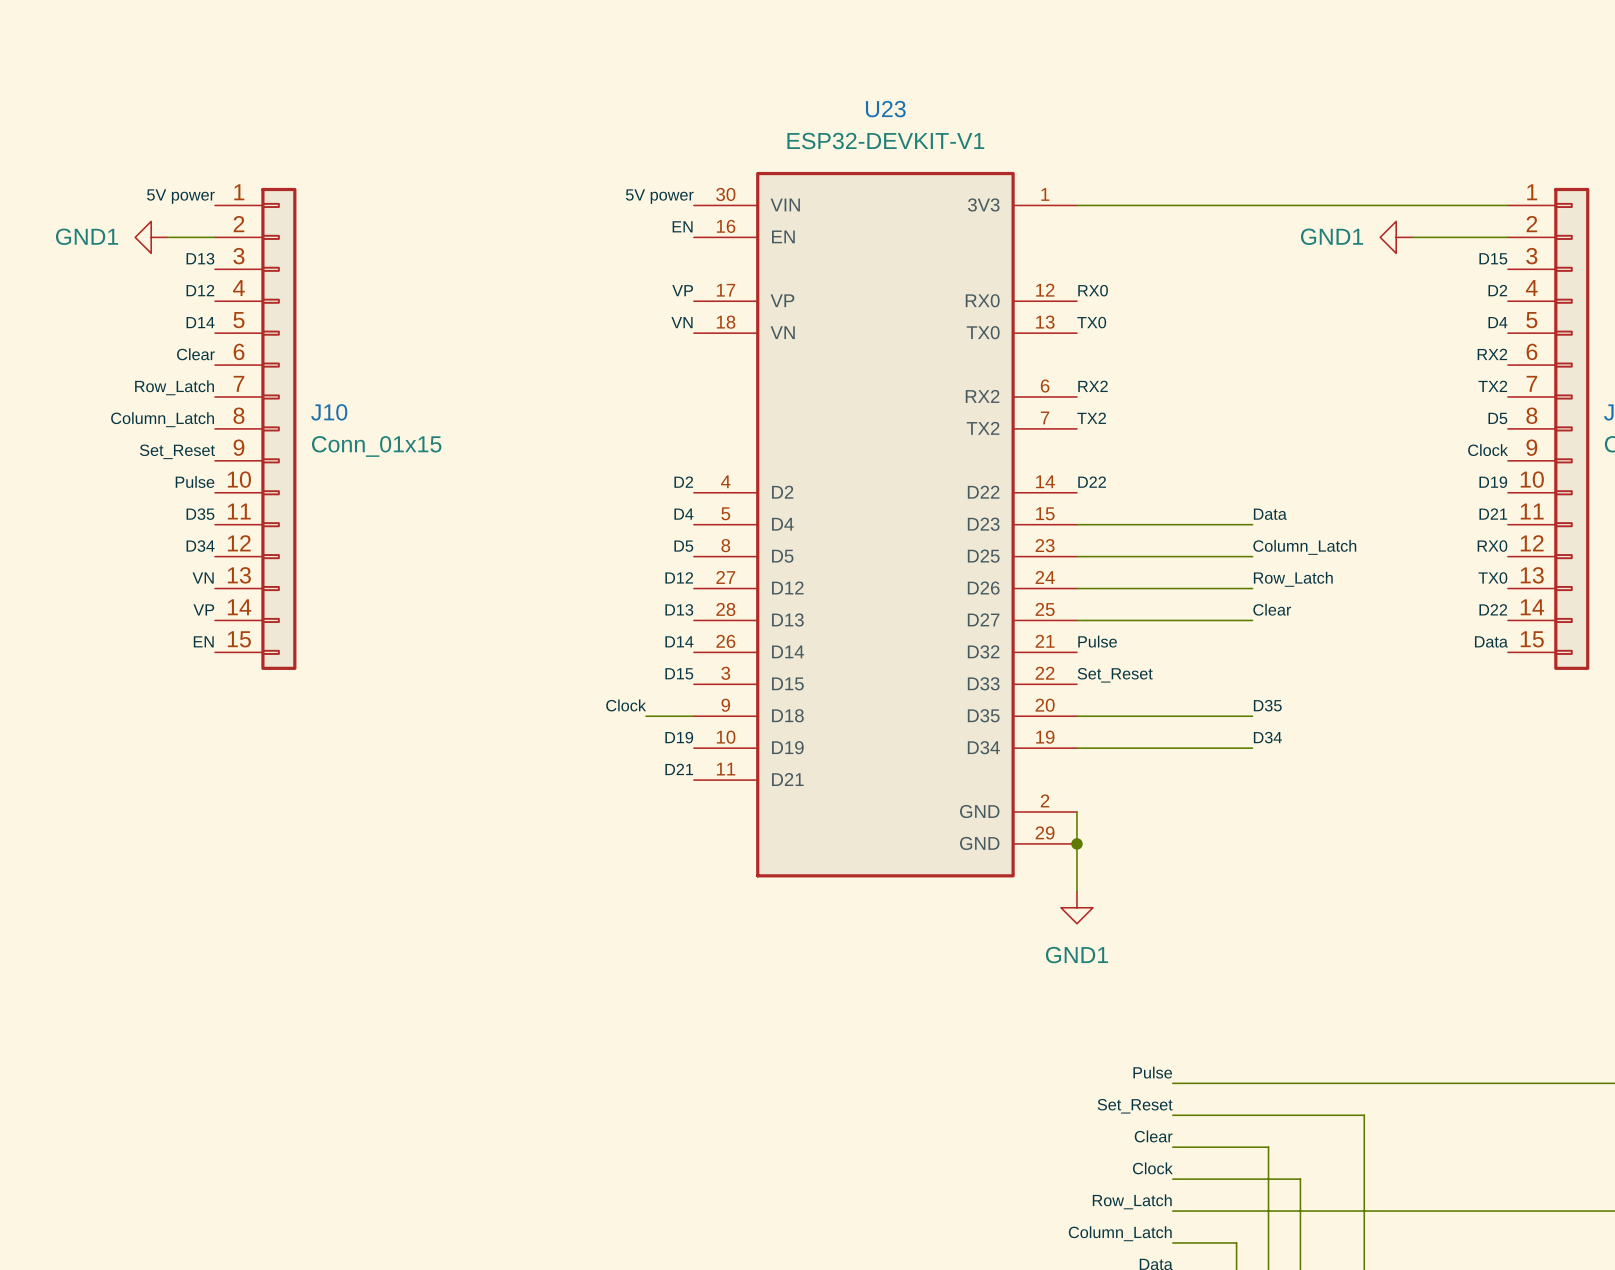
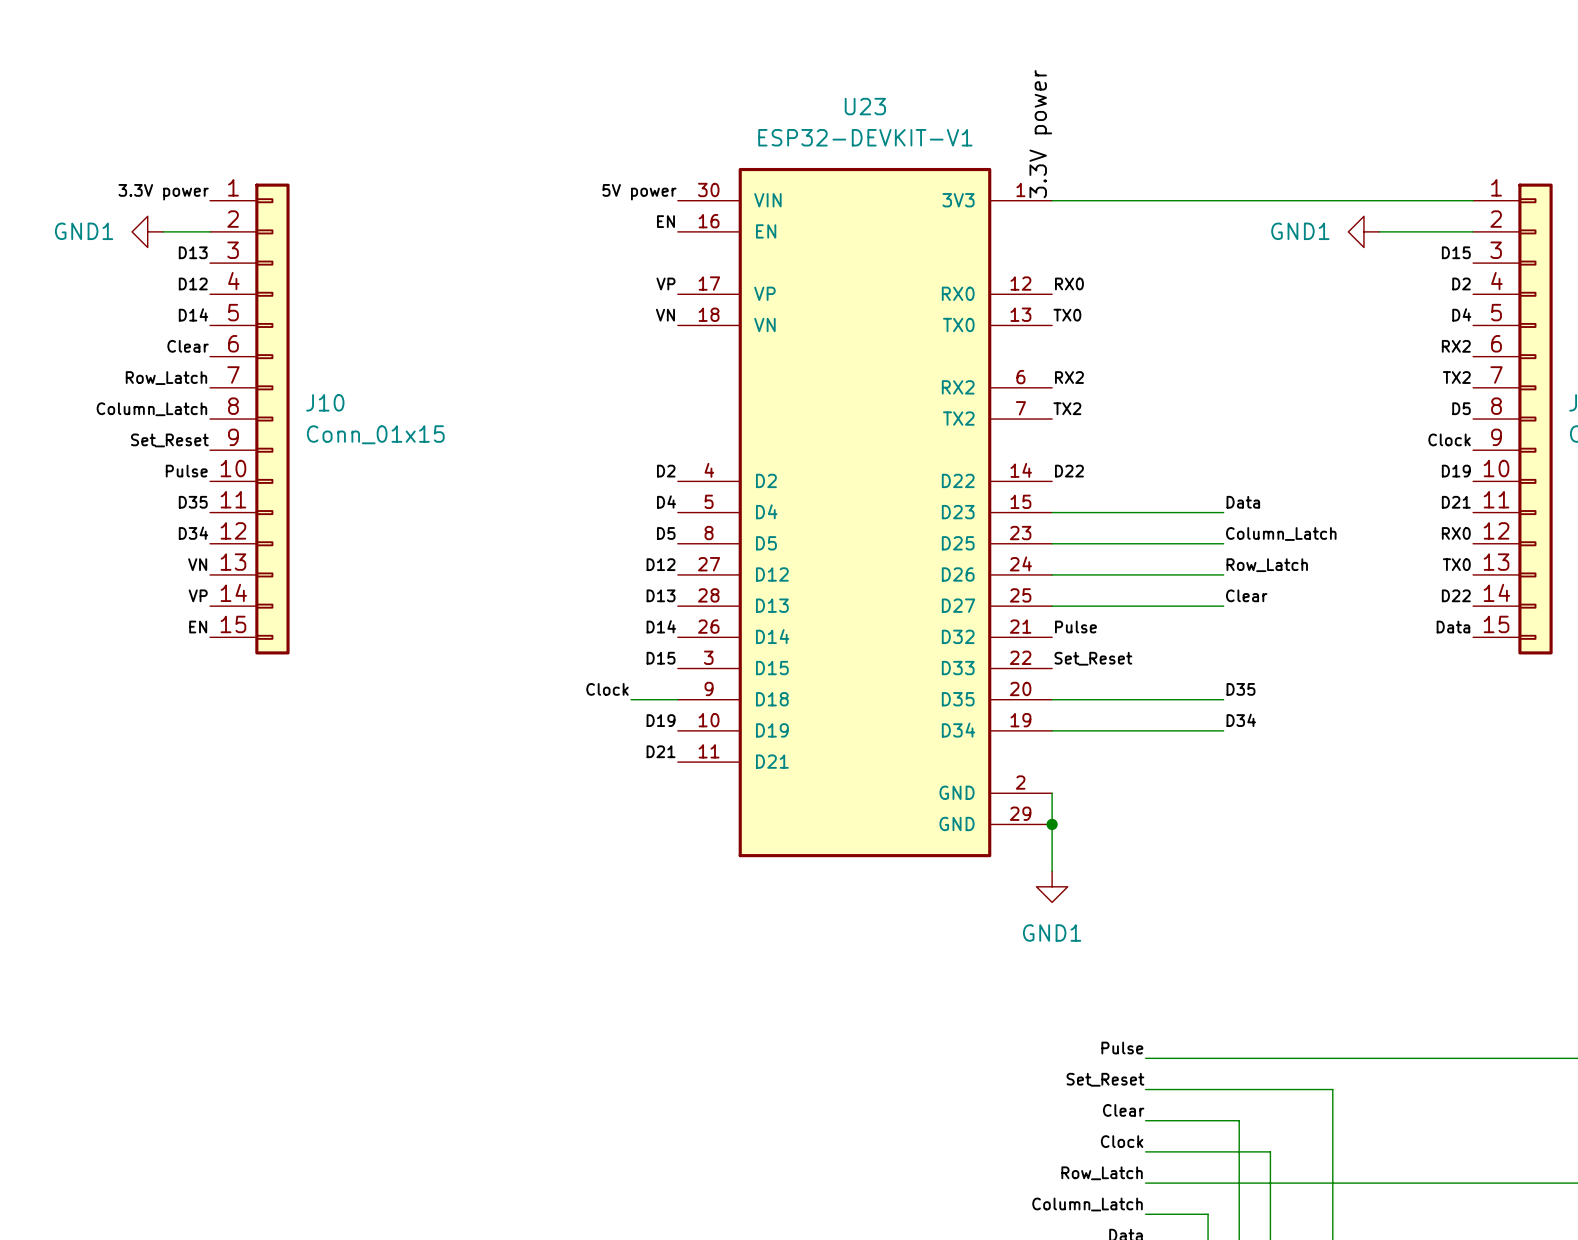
label: none -> 3.3V power (1040, 134)
label: 5V power (180, 196) -> 3.3V power (163, 192)

